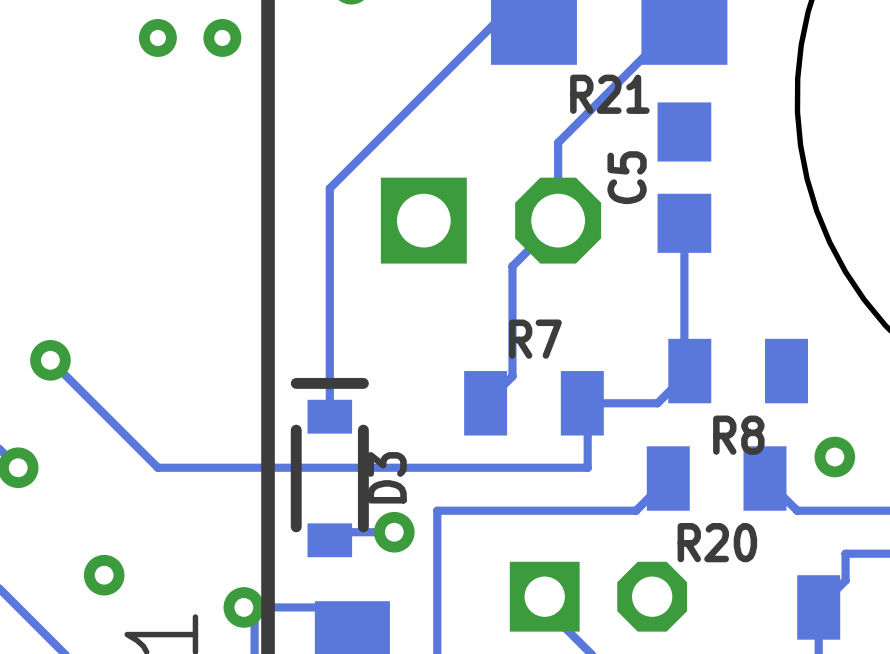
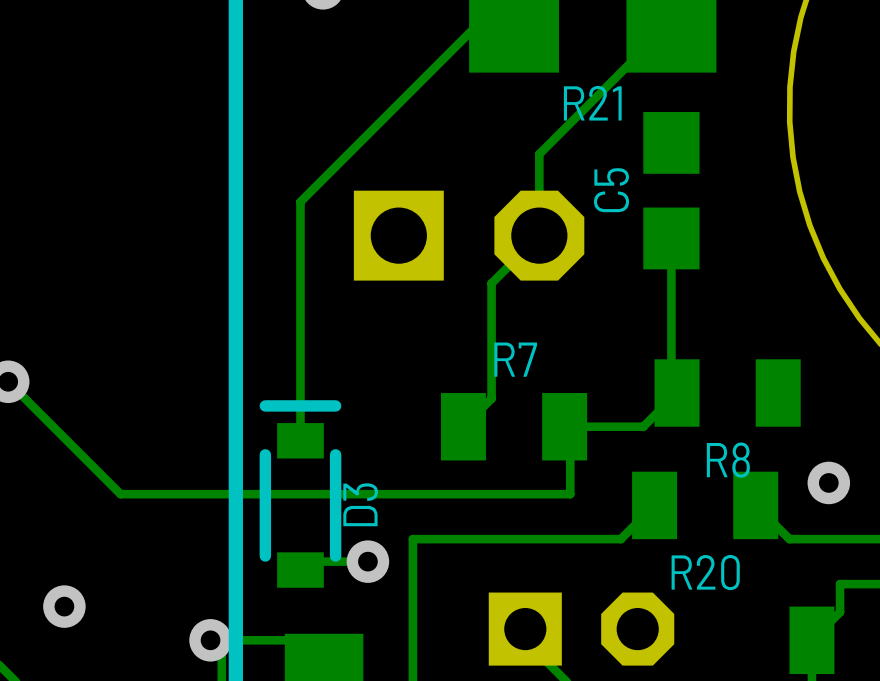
via: (157, 37) -> none
via: (222, 37) -> none

